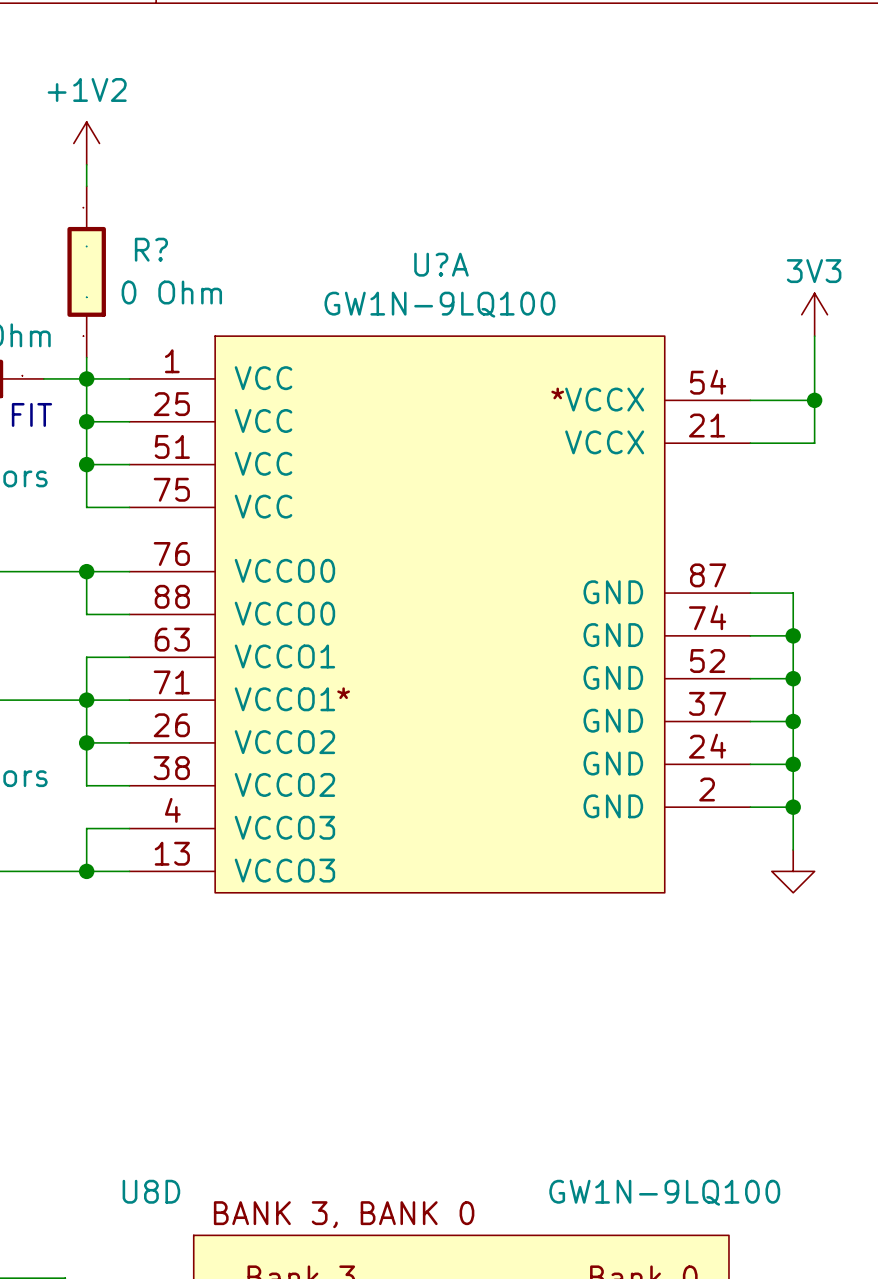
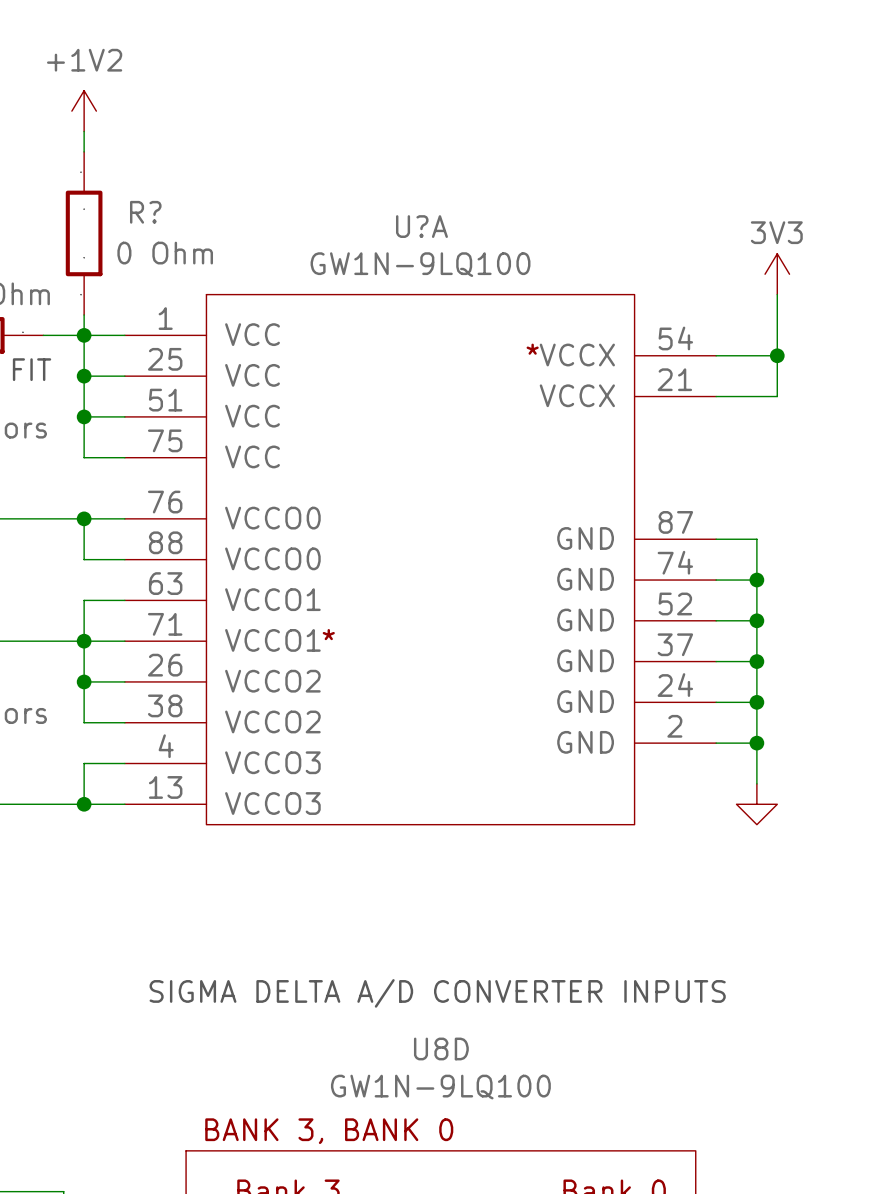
text: none -> SIGMA DELTA A/D CONVERTER INPUTS (437, 993)
U8D name position: U8D (151, 1191) -> U8D (441, 1048)
U8D value position: GW1N-9LQ100 (664, 1192) -> GW1N-9LQ100 (440, 1087)

